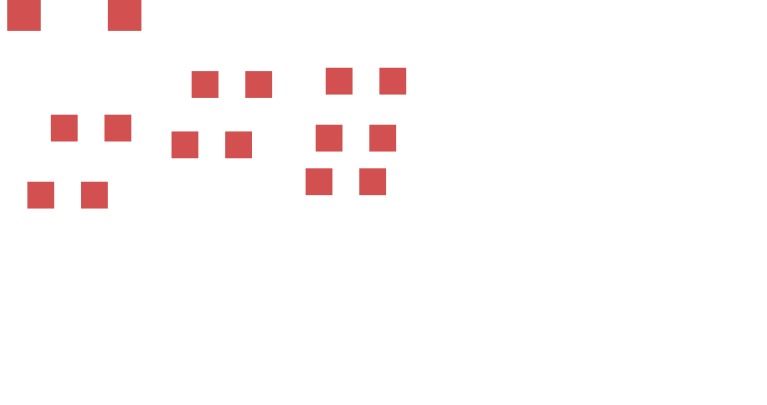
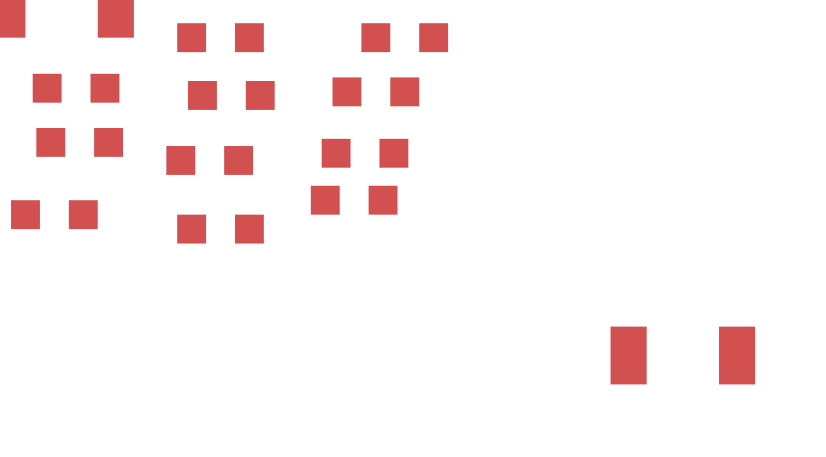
part: none -> (220, 37)
part: none -> (404, 37)
part: none -> (76, 88)
part: none -> (220, 229)
part: none -> (682, 355)

